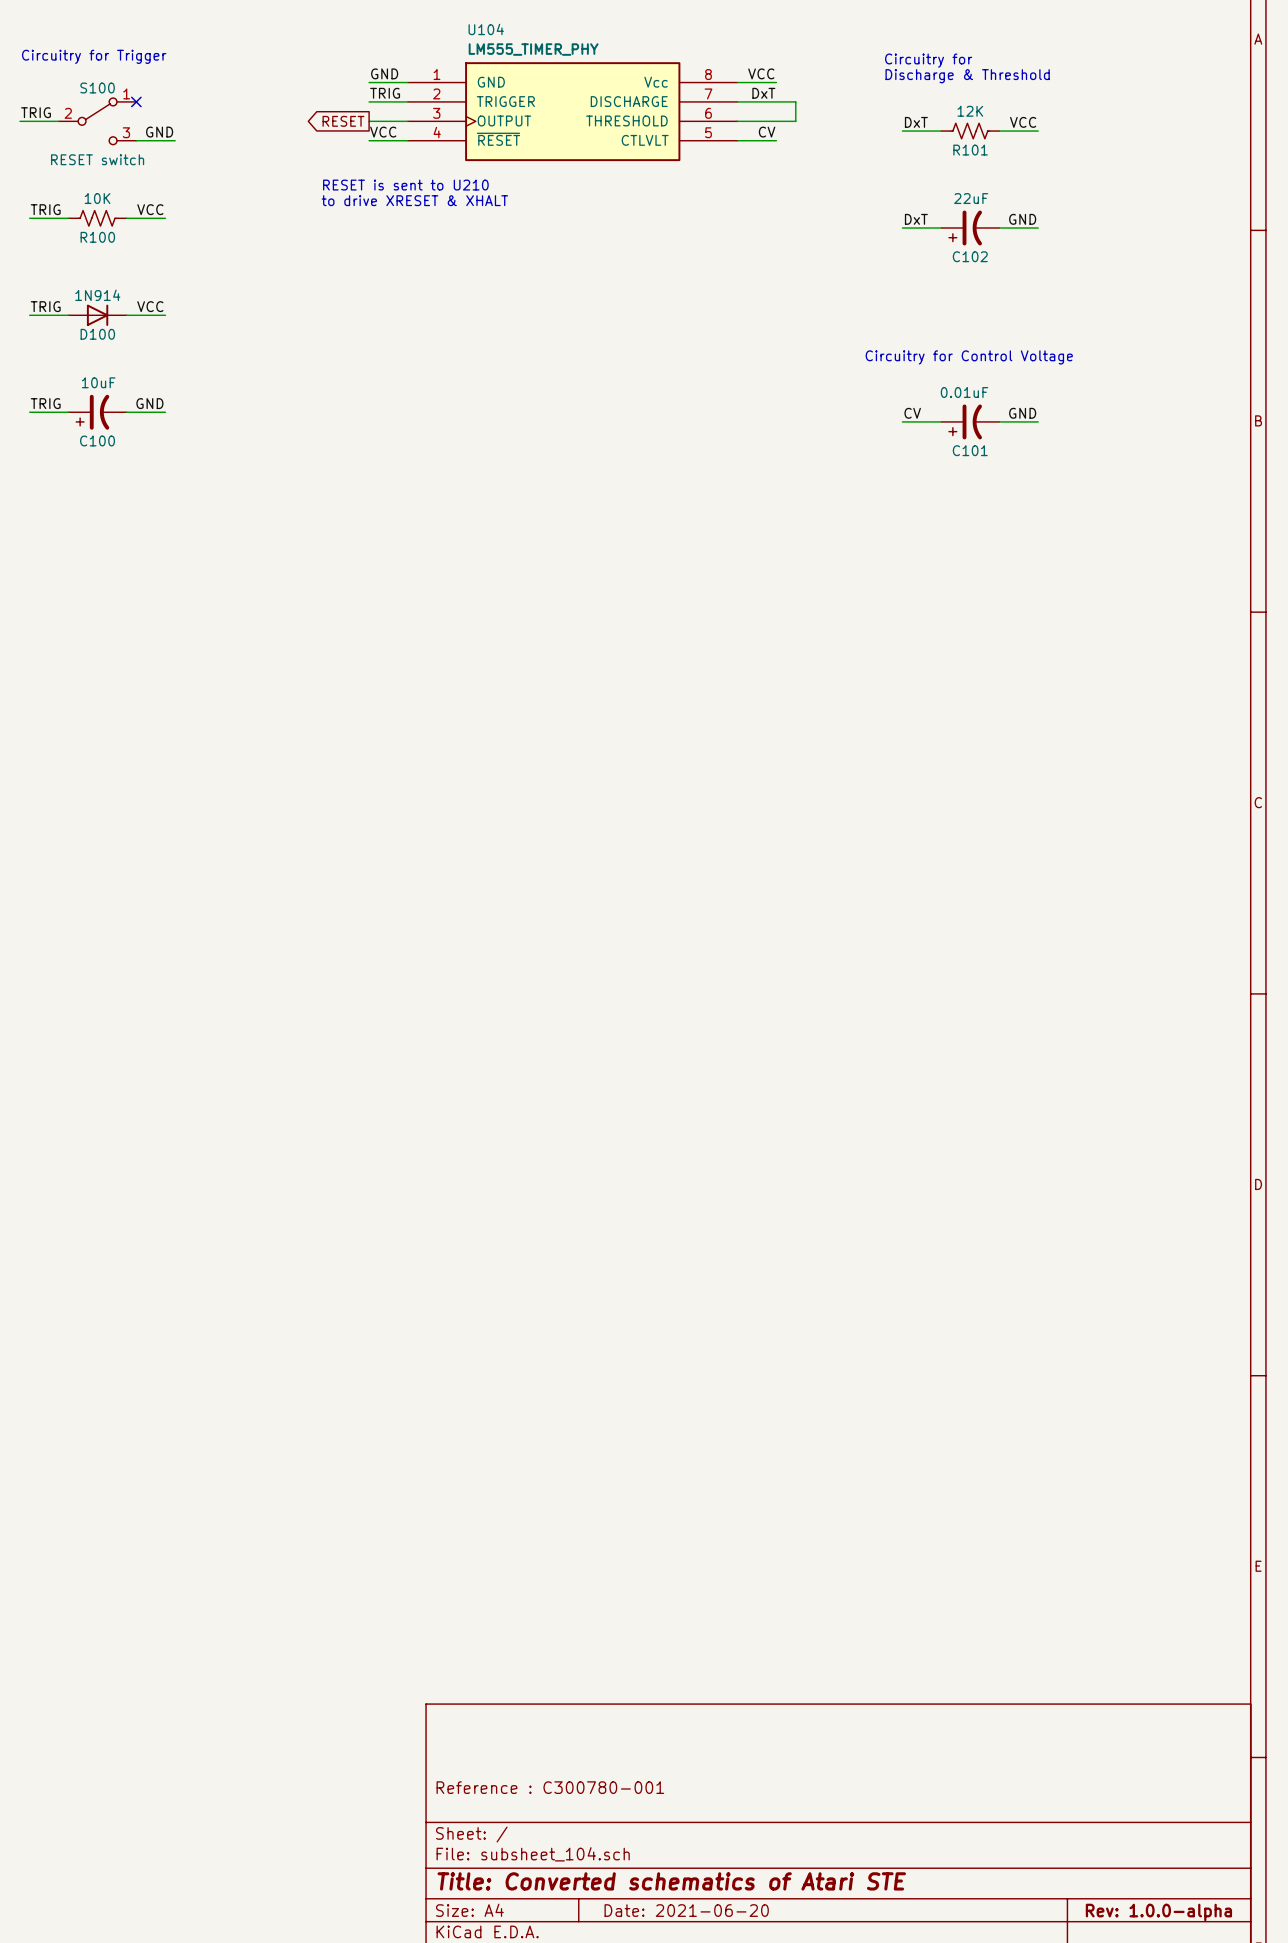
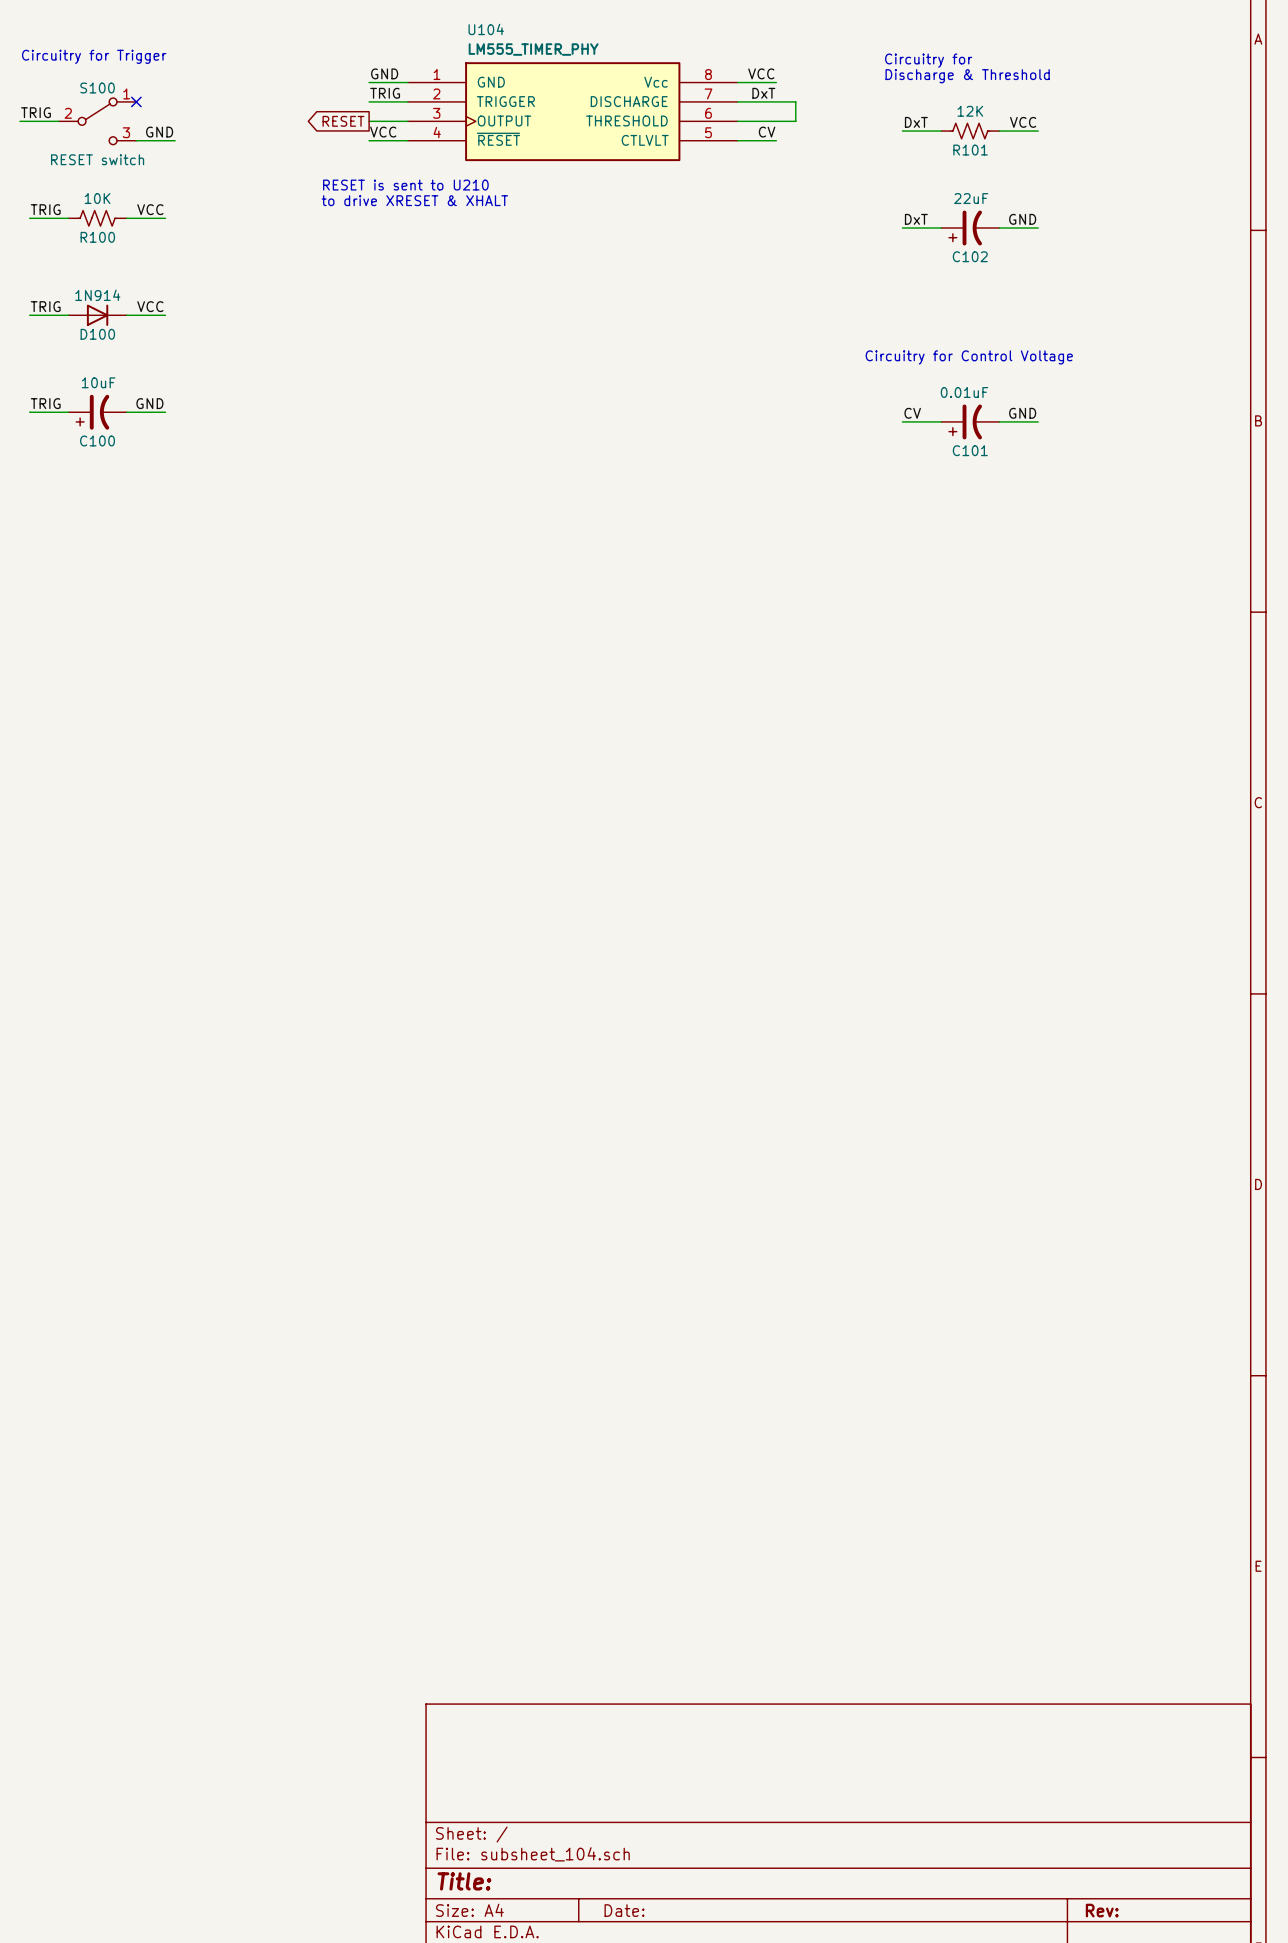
title block: Reference : C300780-001 (550, 1787) -> none
title block: Title: Converted schematics of Atari STE (671, 1881) -> Title: (464, 1881)
title block: Date: 2021-06-20 (686, 1910) -> Date: (624, 1910)
title block: Rev: 1.0.0-alpha (1158, 1912) -> Rev: (1102, 1910)

